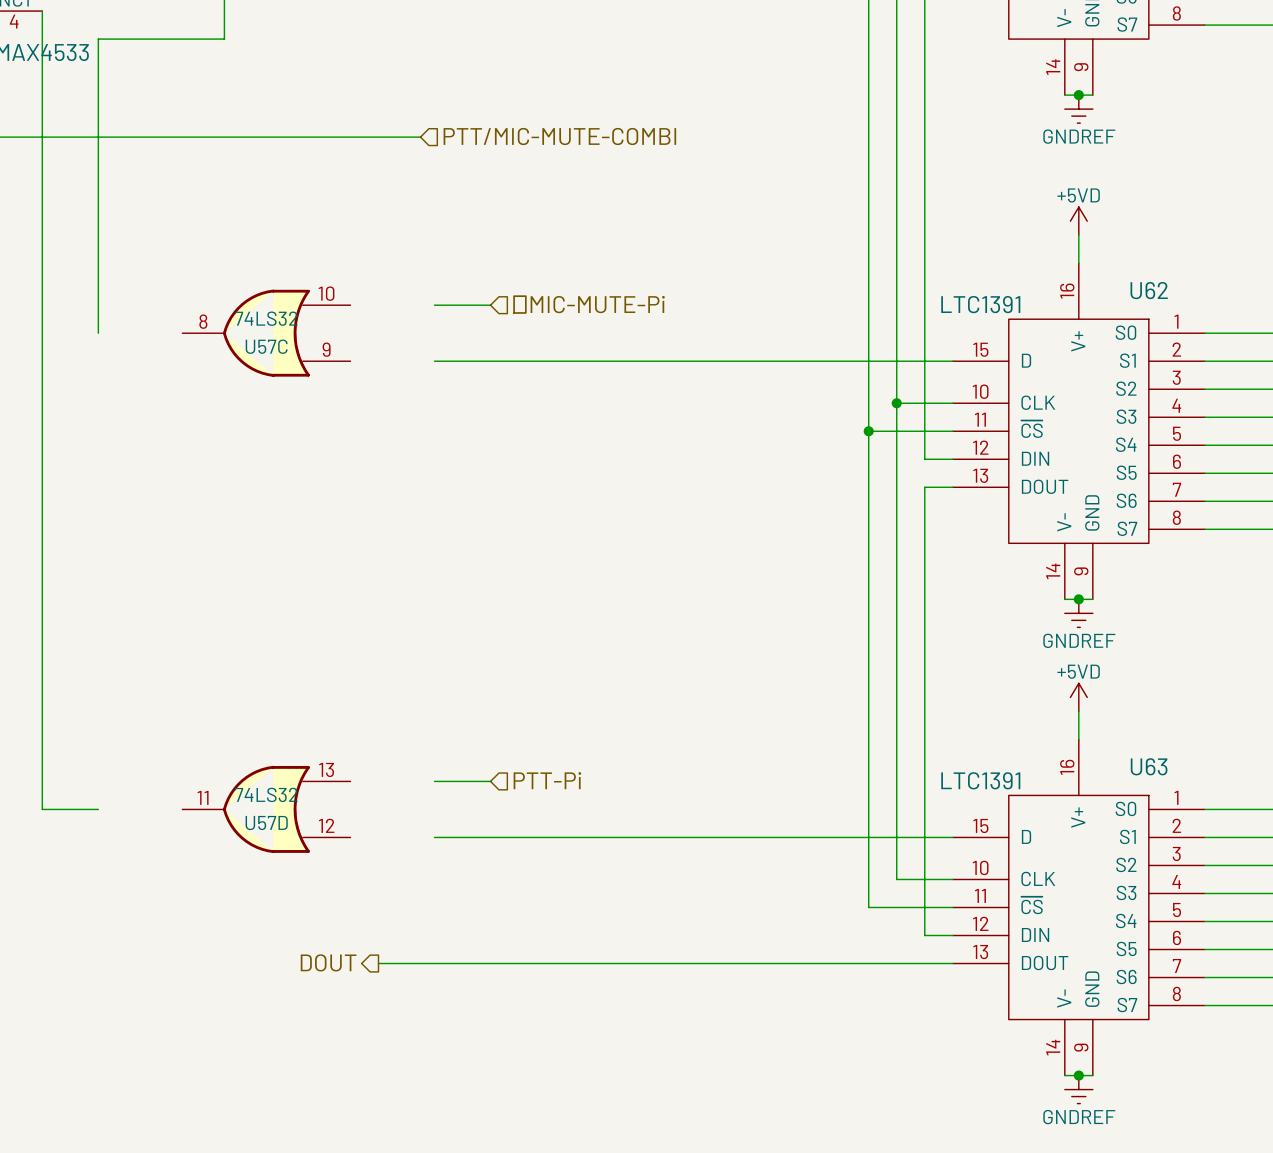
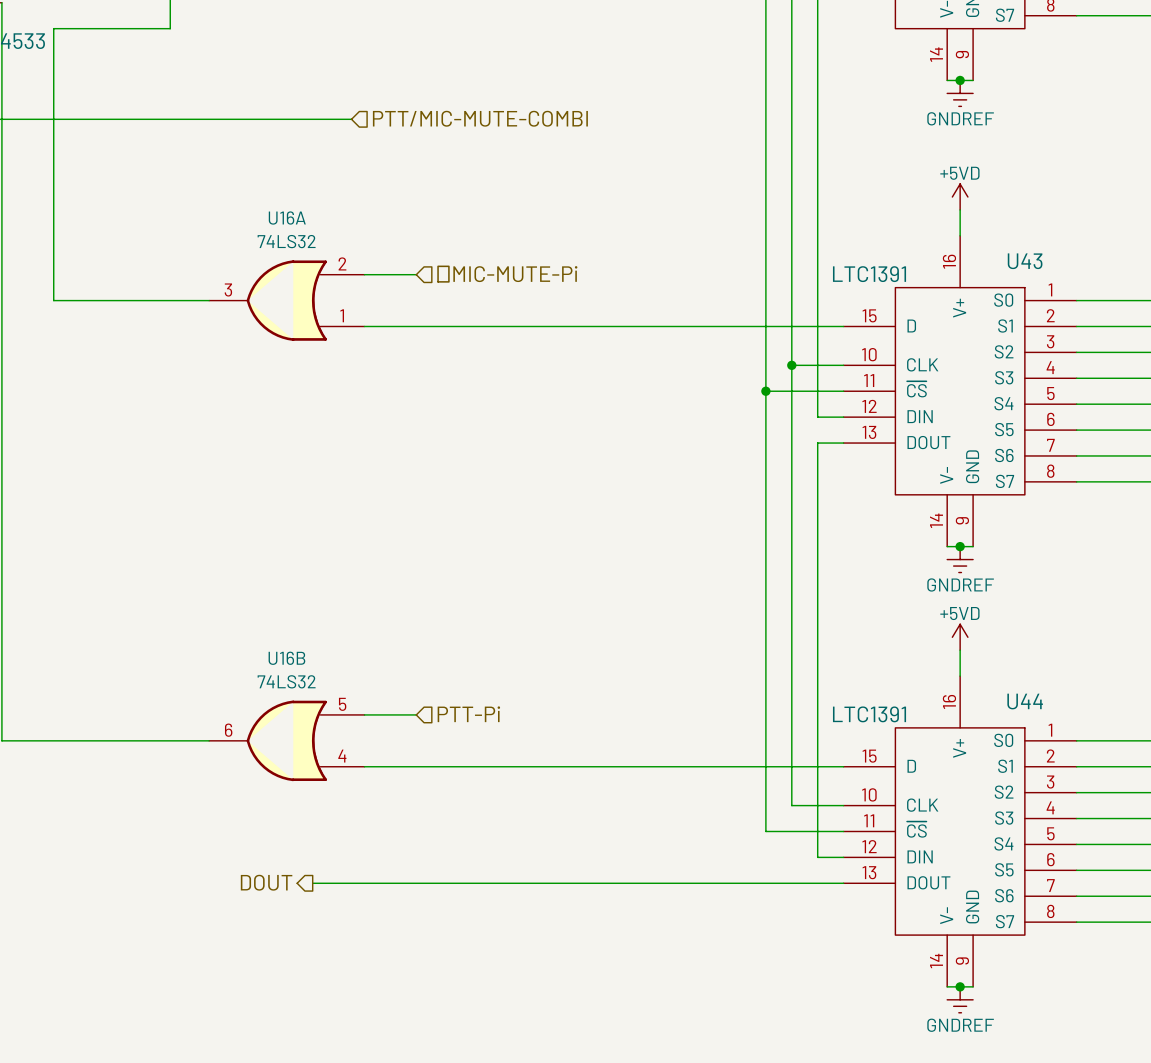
U62 name: U62 (1149, 290) -> U43 (1025, 261)
wire: none -> (53, 300) (209, 300)
U57C: 74LS32 (266, 333) -> none
U16A: none -> 74LS32 (286, 300)
U63 name: U63 (1149, 766) -> U44 (1025, 701)
wire: none -> (53, 740) (209, 740)
U57D: 74LS32 (266, 809) -> none
U16B: none -> 74LS32 (286, 740)

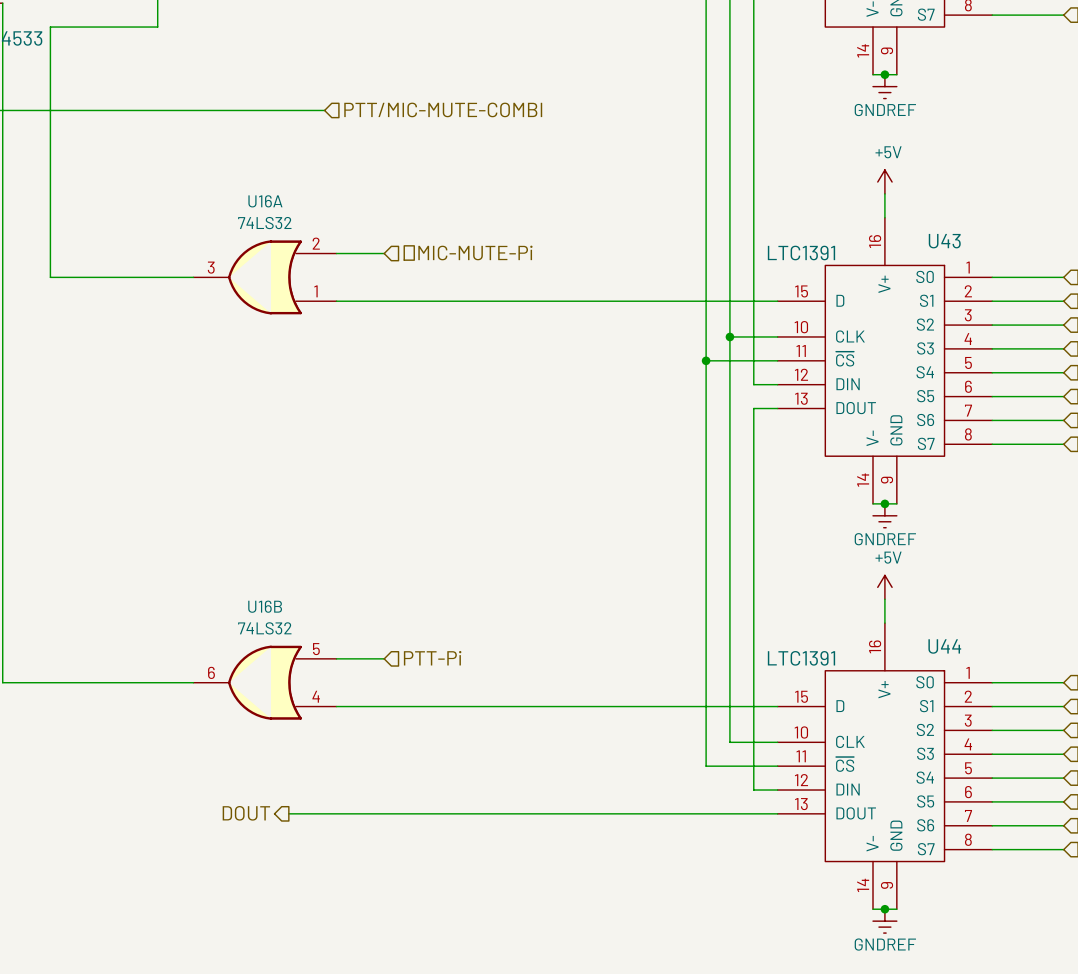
power symbol: +5VD (960, 197) -> +5V (884, 182)
power symbol: +5VD (960, 637) -> +5V (884, 587)

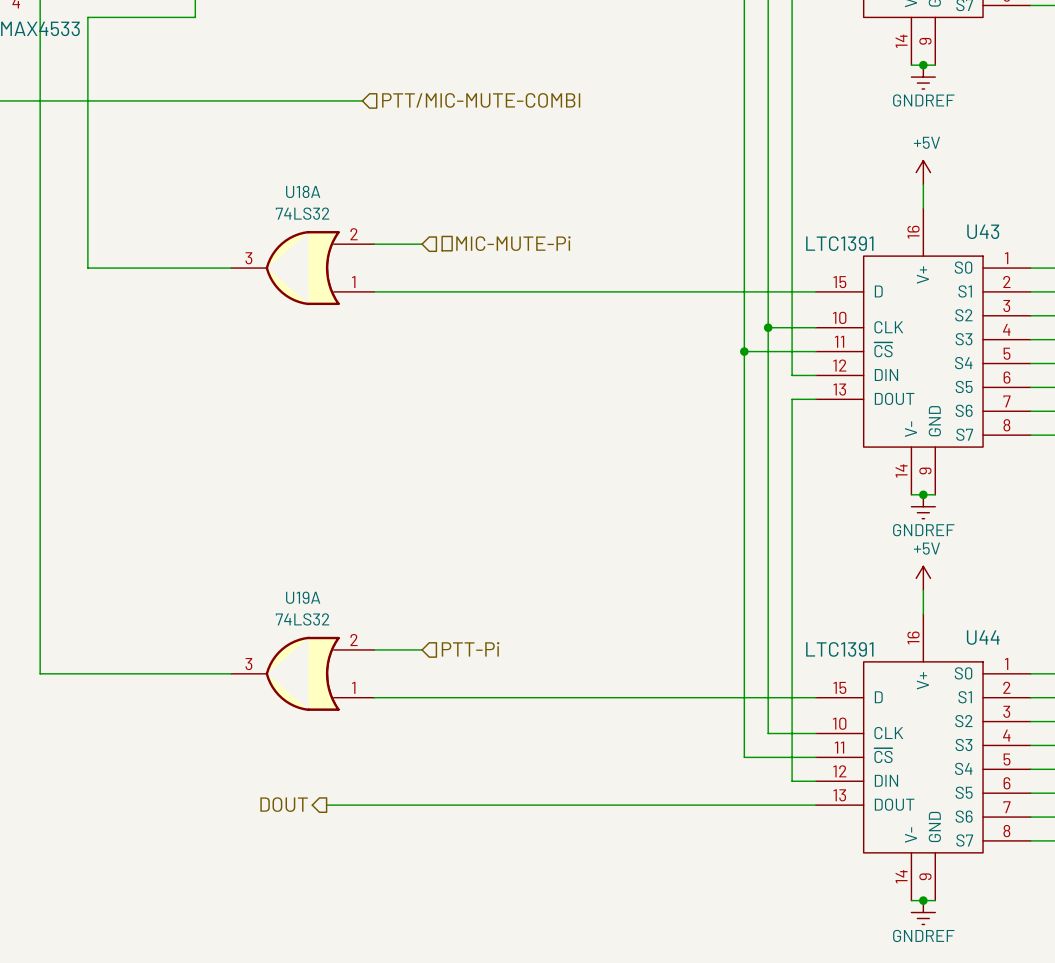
U16A name: U16A (265, 201) -> U18A (303, 191)
U16B name: U16B (265, 606) -> U19A (303, 597)
U16B pin number: 5 (316, 649) -> 2 (354, 640)
U16B pin number: 6 (211, 672) -> 3 (248, 664)
U16B pin number: 4 (316, 696) -> 1 (353, 687)

